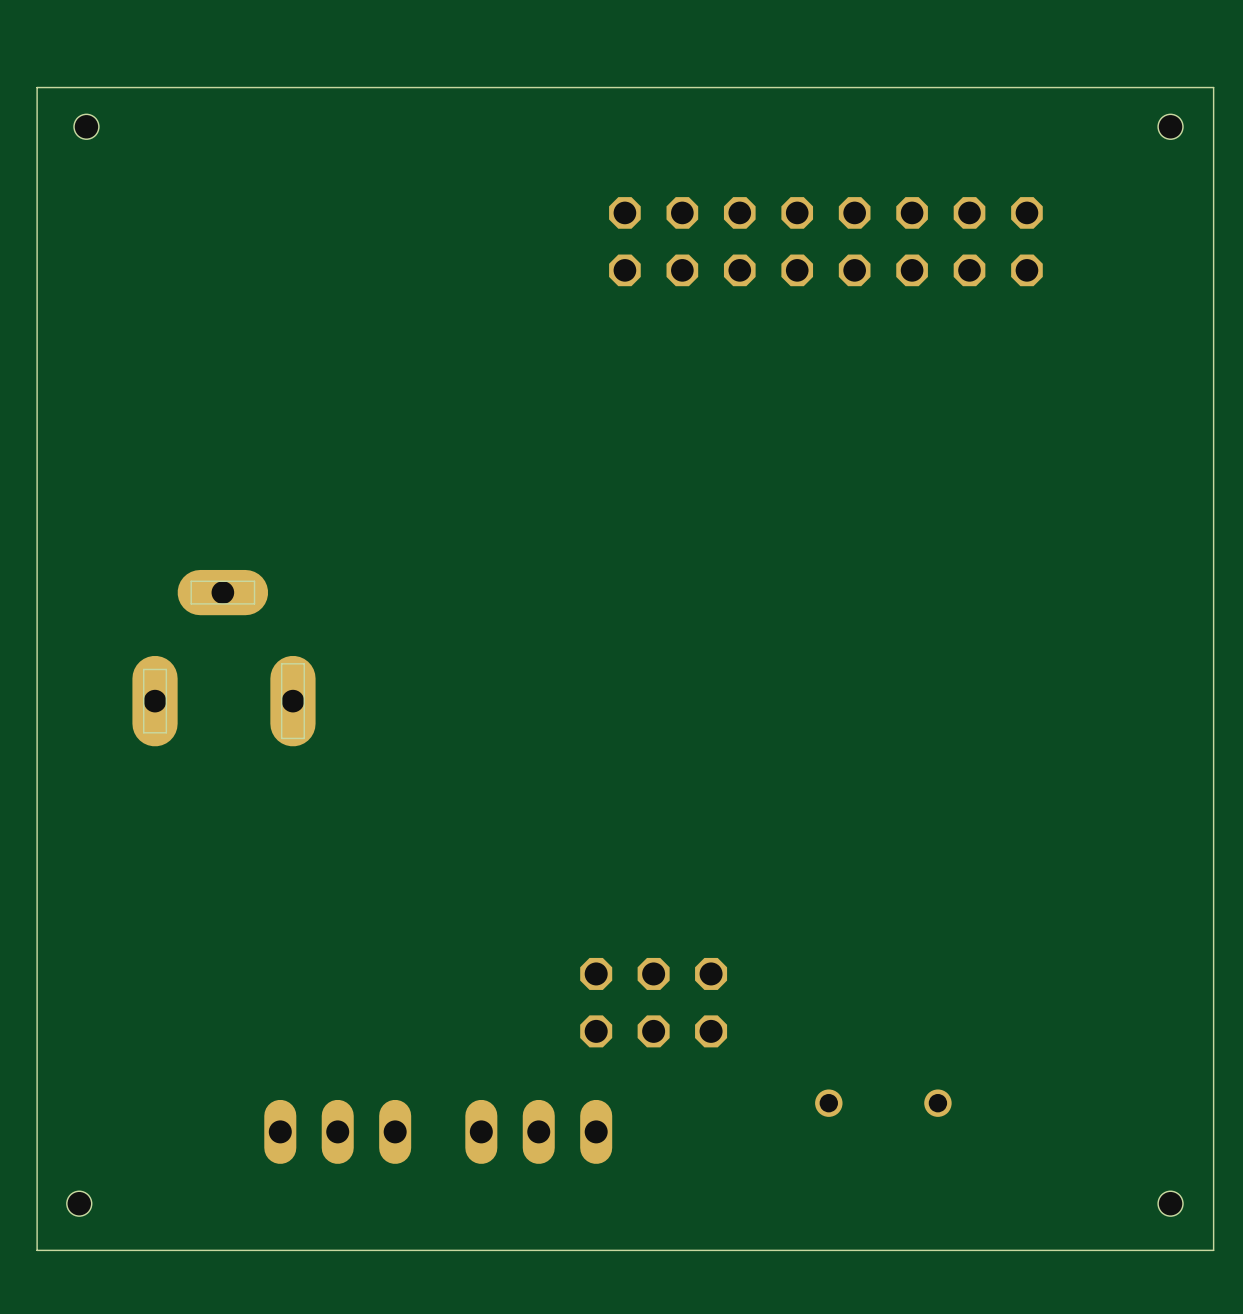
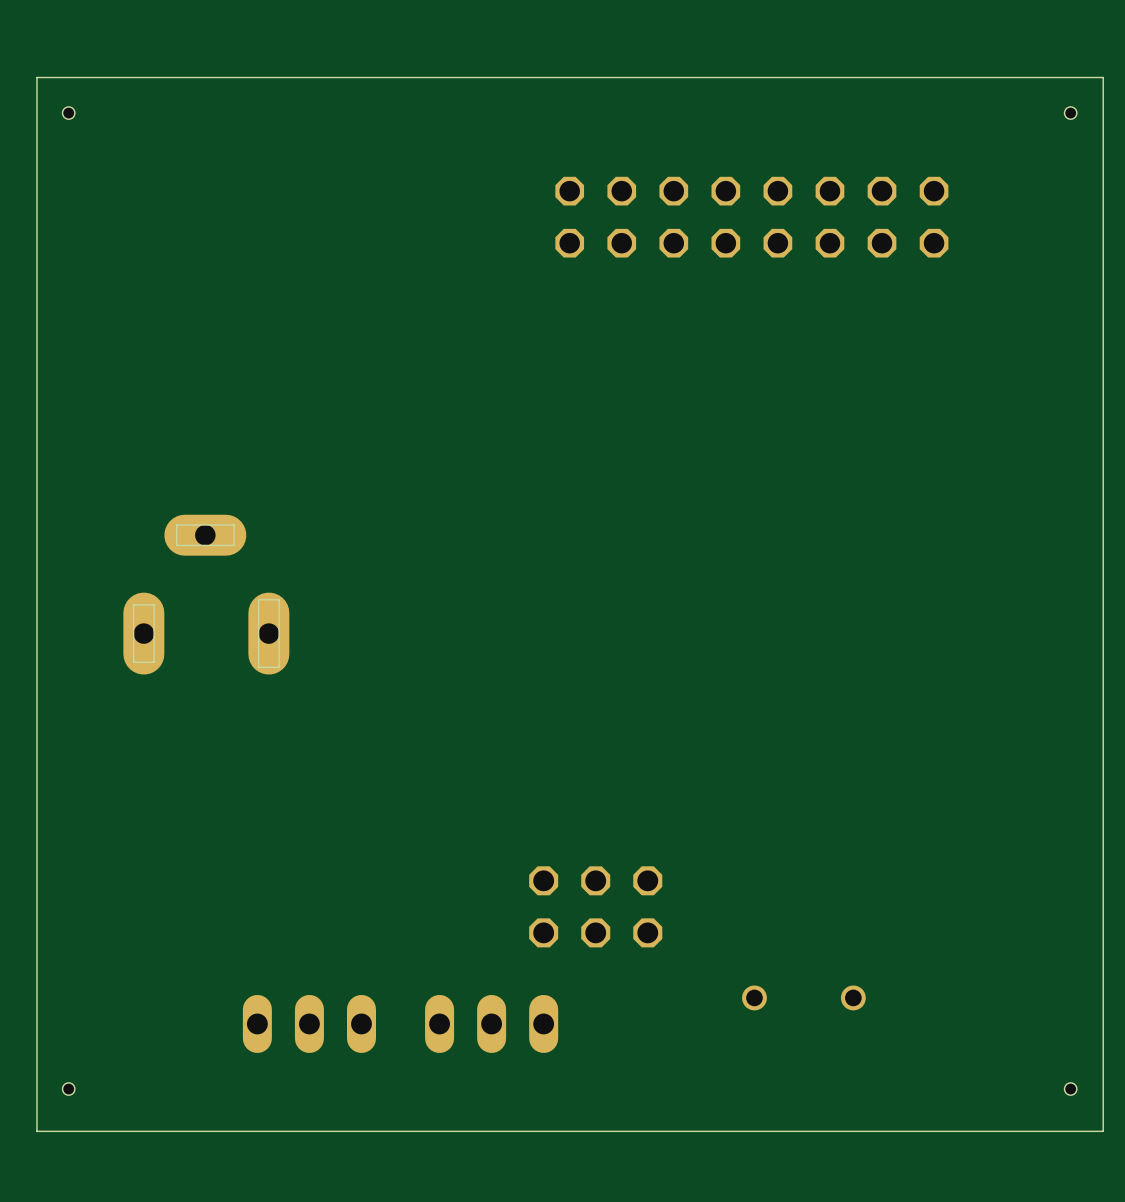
hole size: [74, 114, 99, 140] -> [62, 106, 75, 120]
hole size: [1158, 114, 1183, 140] -> [1064, 106, 1077, 120]
hole size: [66, 1191, 92, 1217] -> [62, 1082, 75, 1096]
hole size: [1158, 1191, 1183, 1217] -> [1064, 1082, 1077, 1096]

